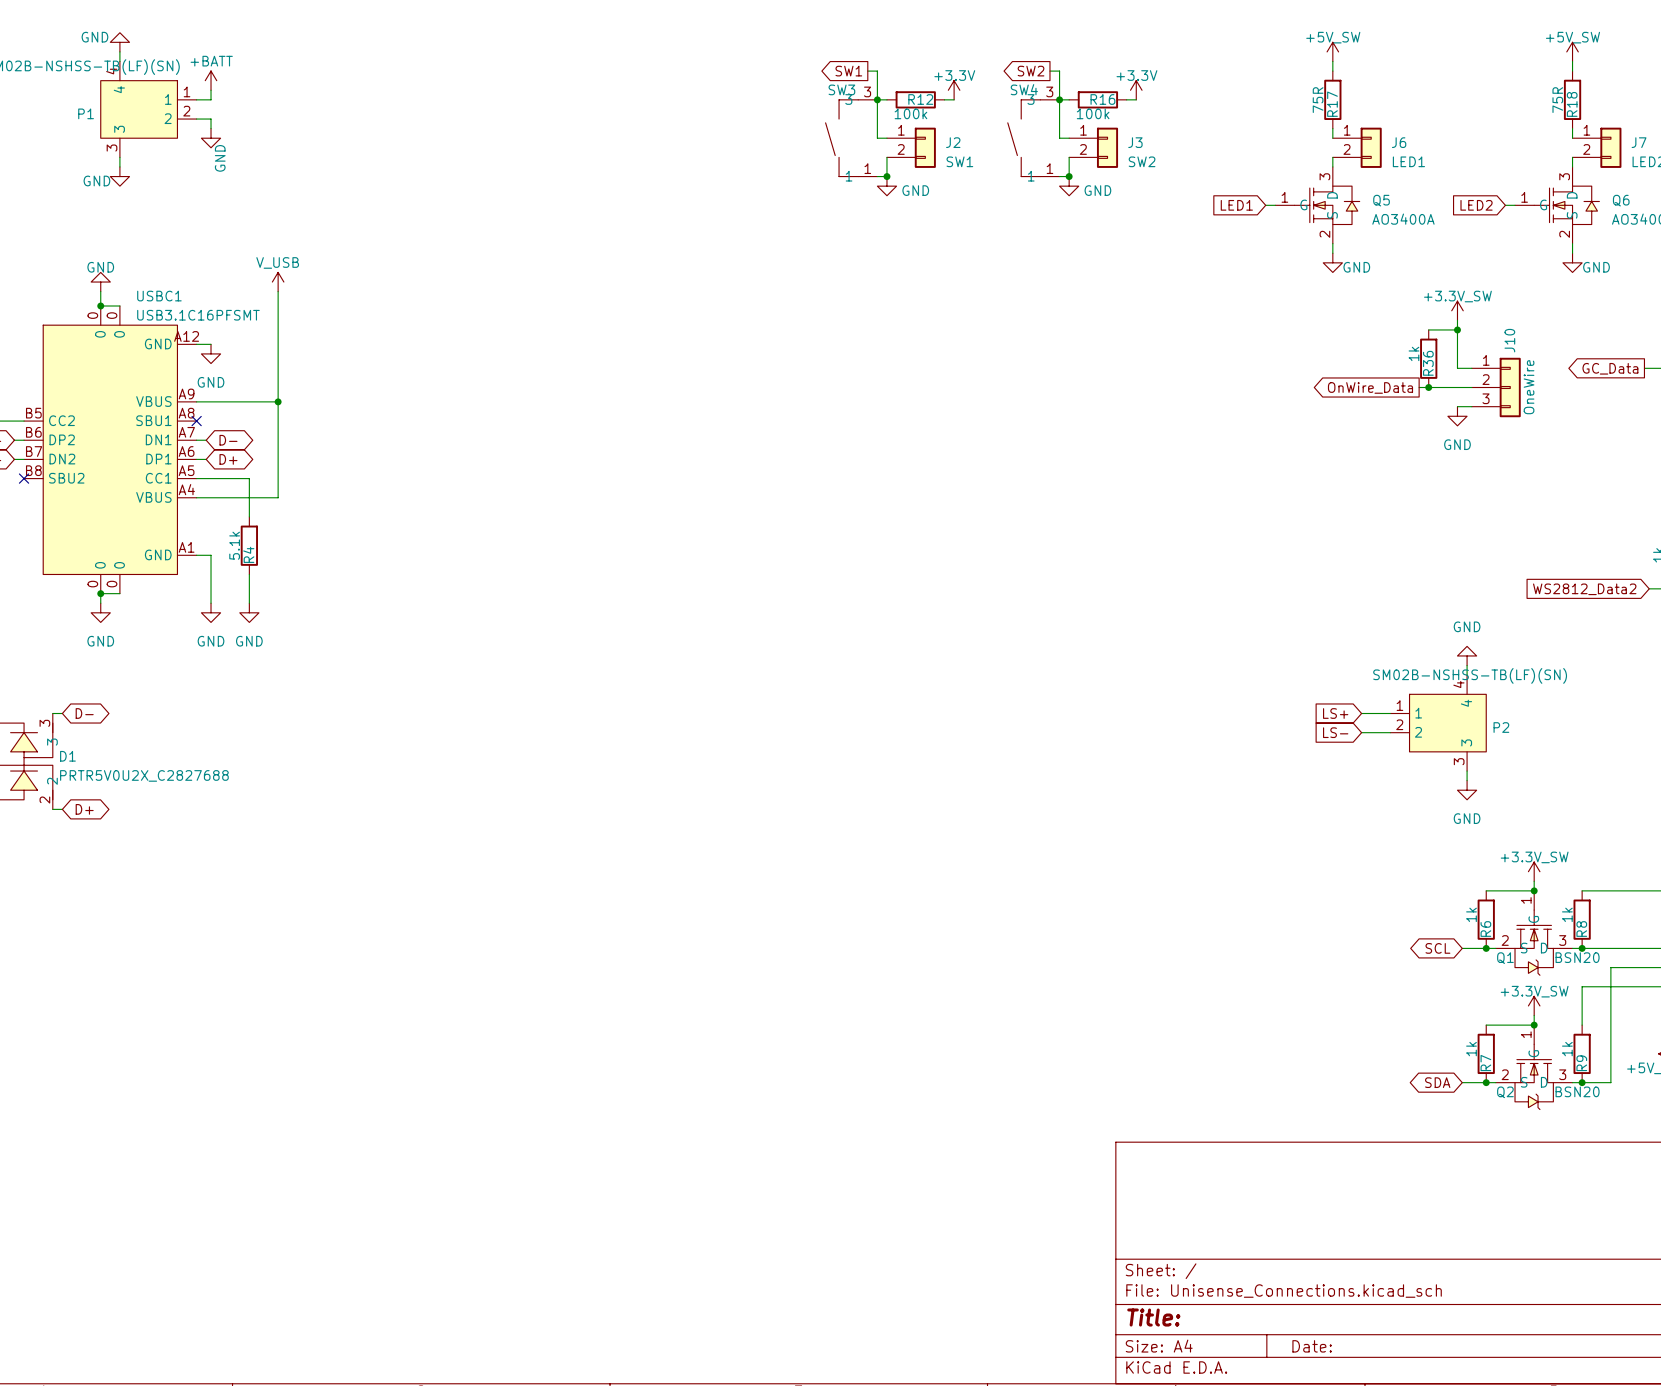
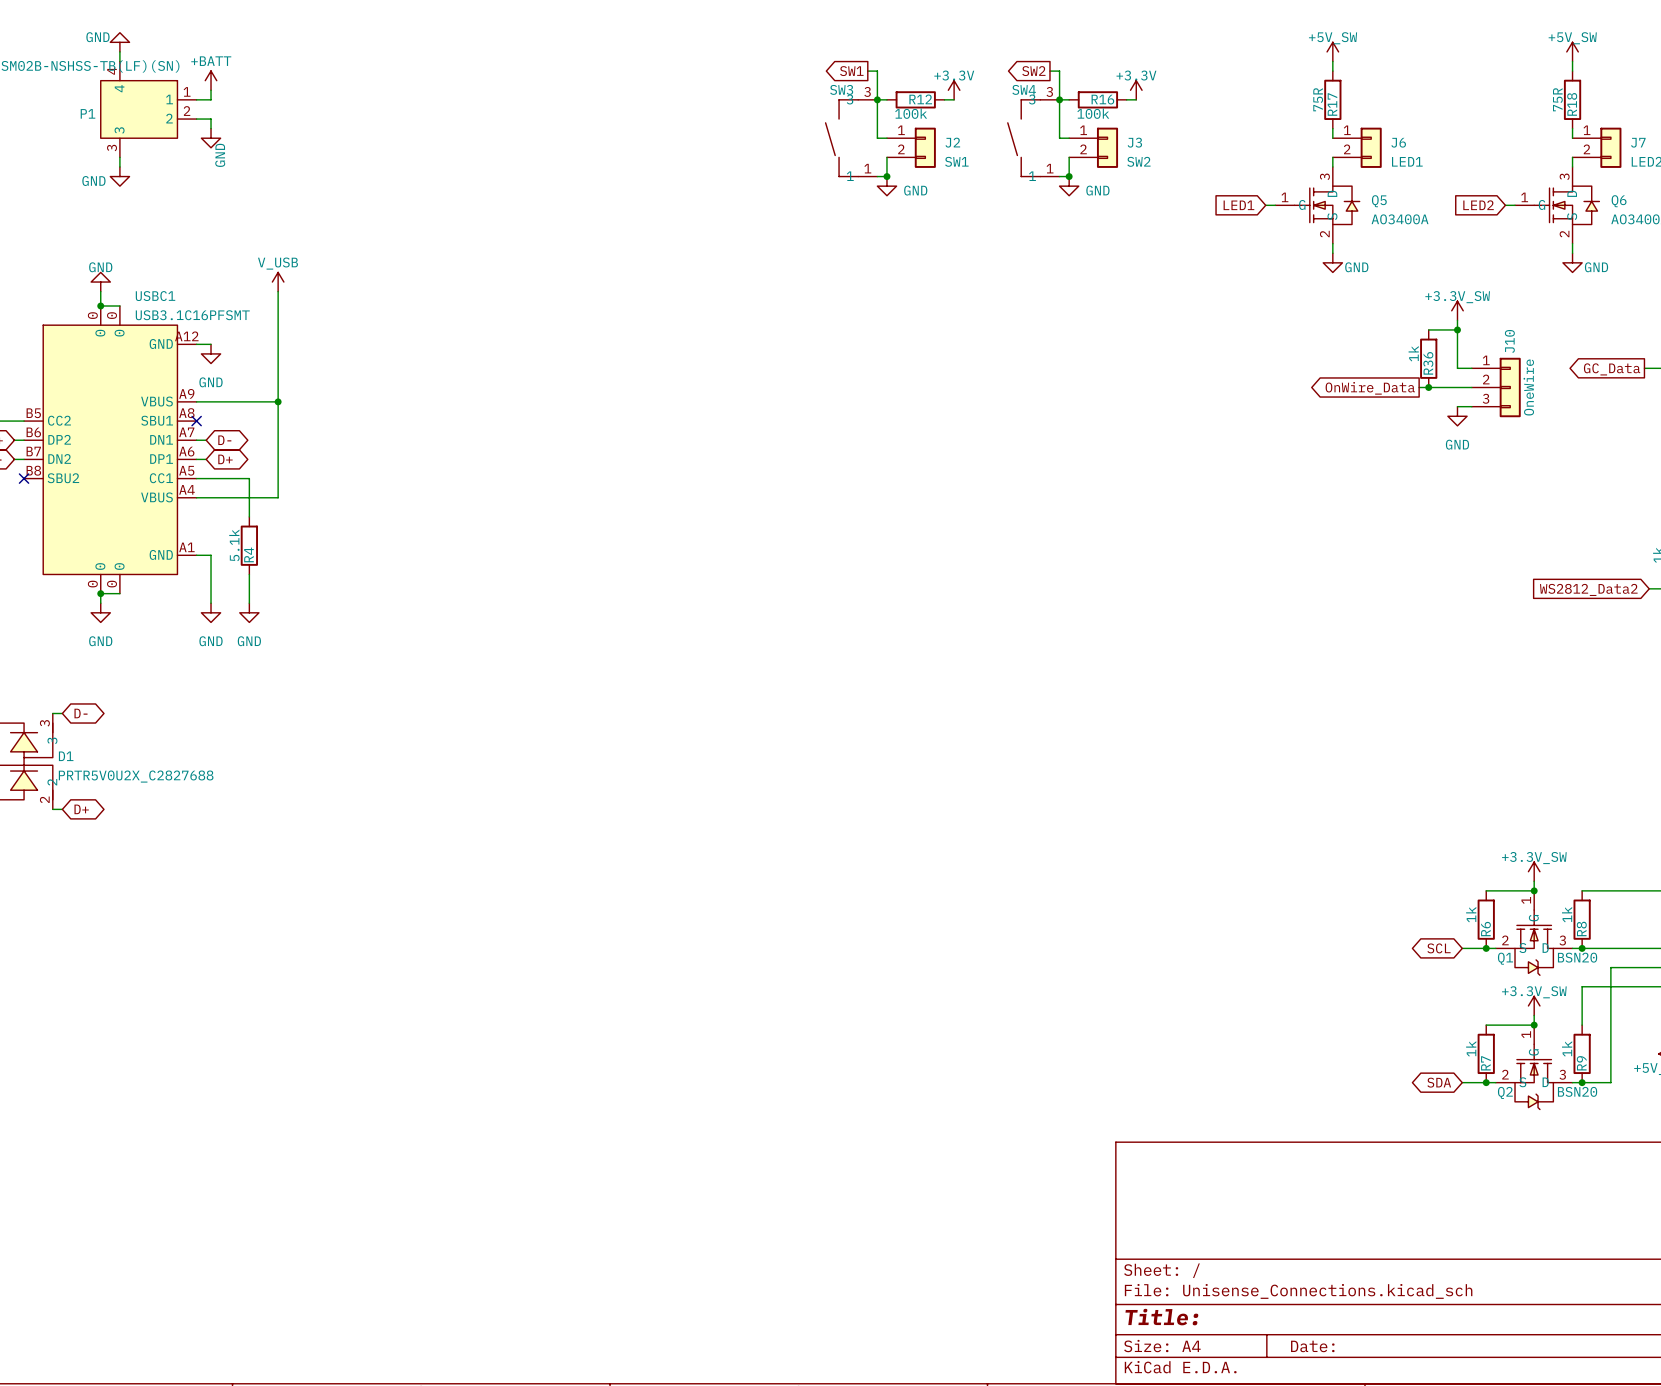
power symbol: GND (1467, 655) -> none
wire: (1467, 665) (1467, 675) -> none
global label: LS+ (1335, 713) -> none
wire: (1361, 713) (1390, 713) -> none
P2: SM02B-NSHSS-TB(LF)(SN) (1438, 723) -> none
global label: LS- (1335, 732) -> none
wire: (1361, 732) (1390, 732) -> none
wire: (1467, 771) (1467, 780) -> none
power symbol: GND (1467, 790) -> none

